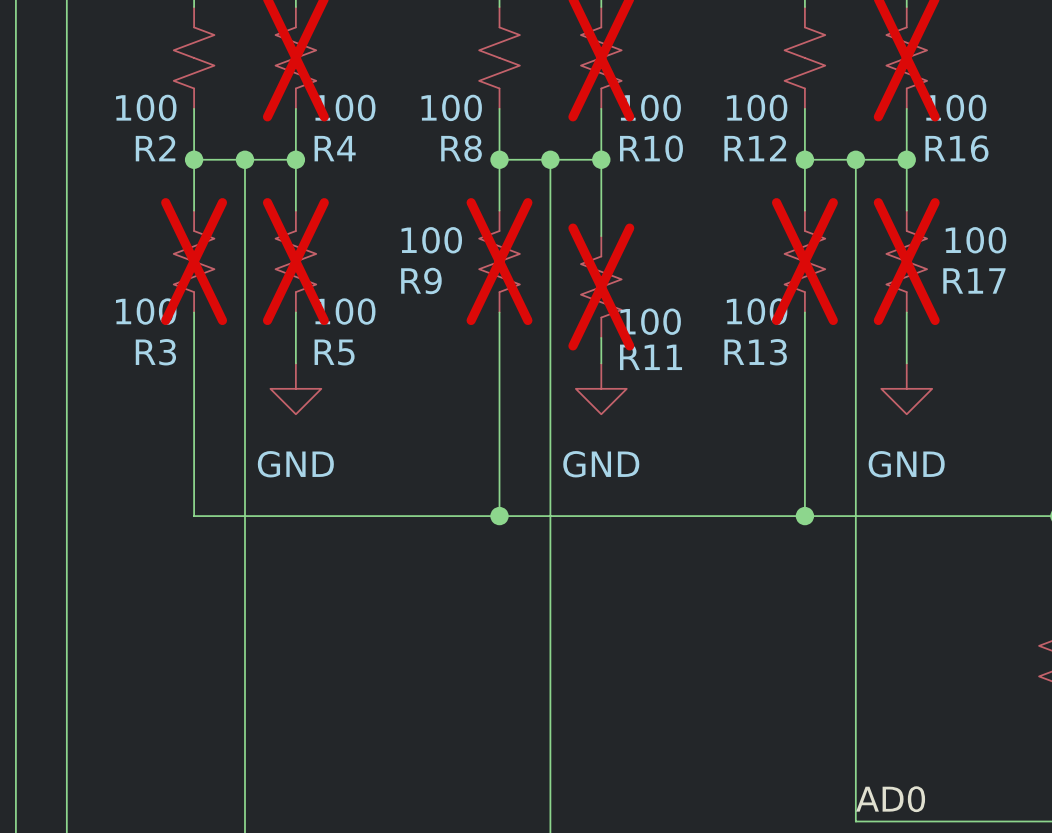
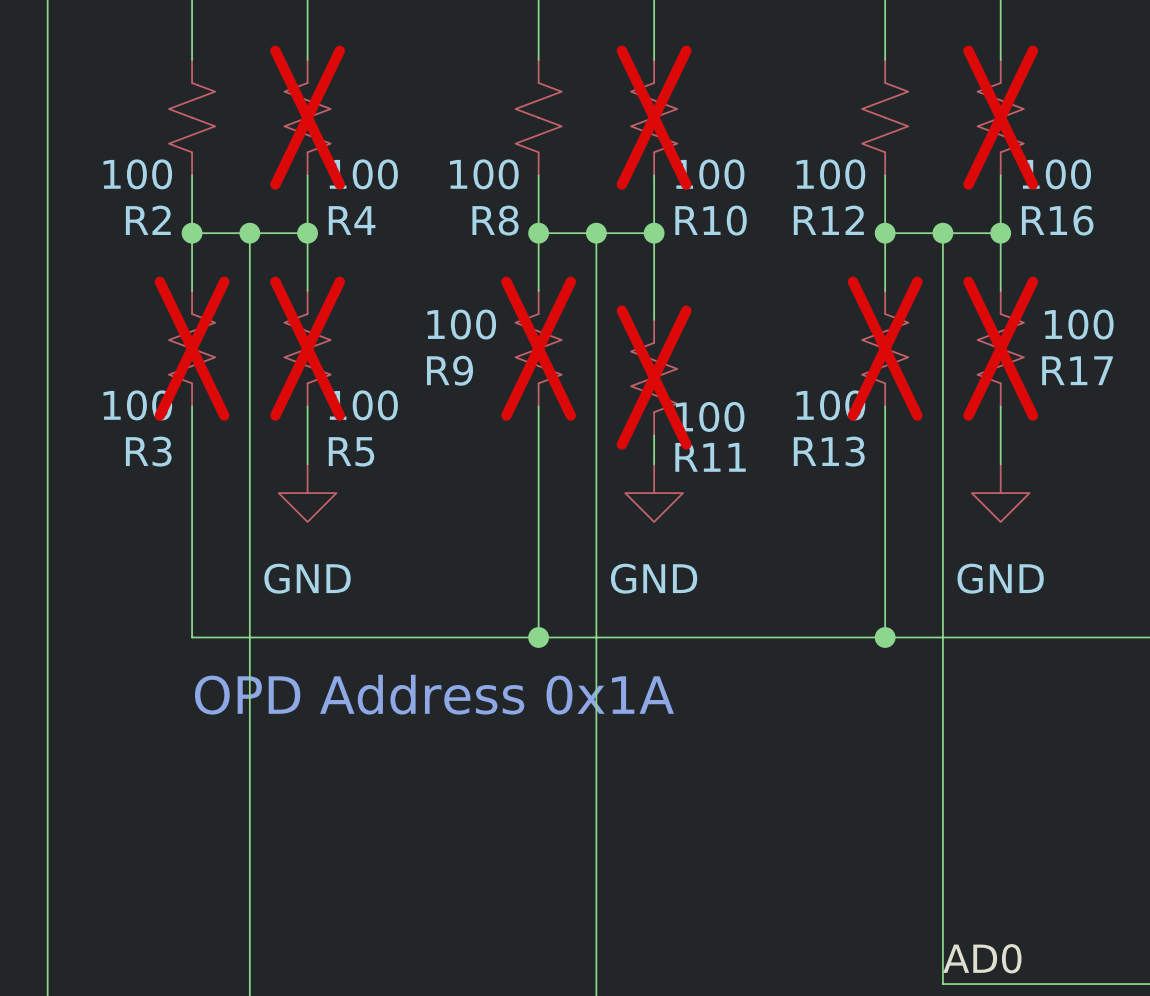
text: none -> OPD Address 0x1A (434, 694)

